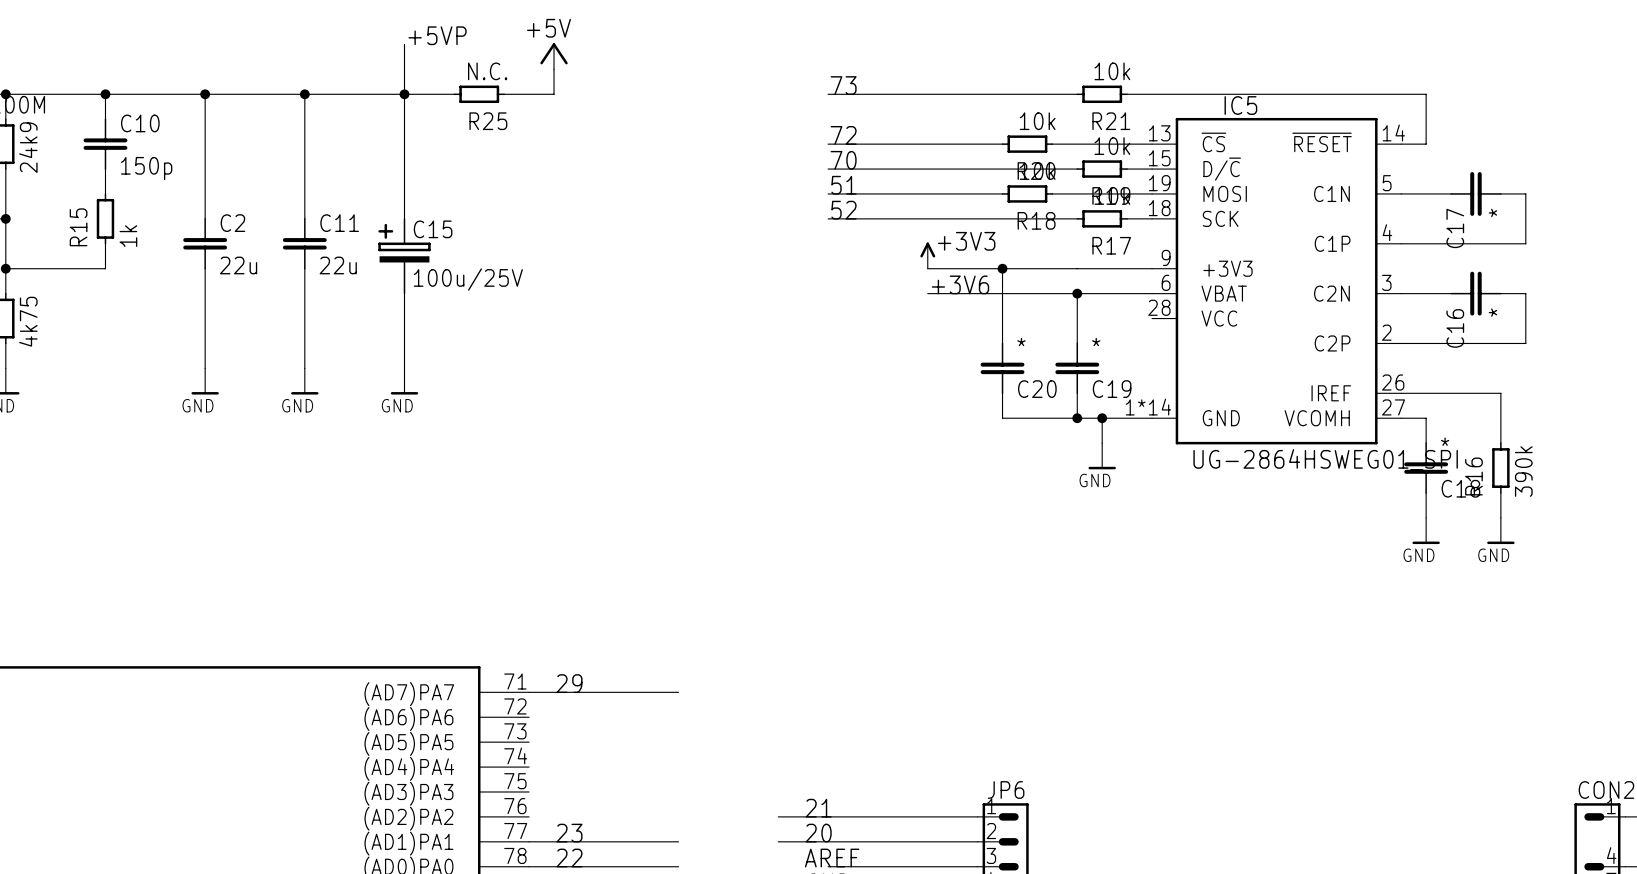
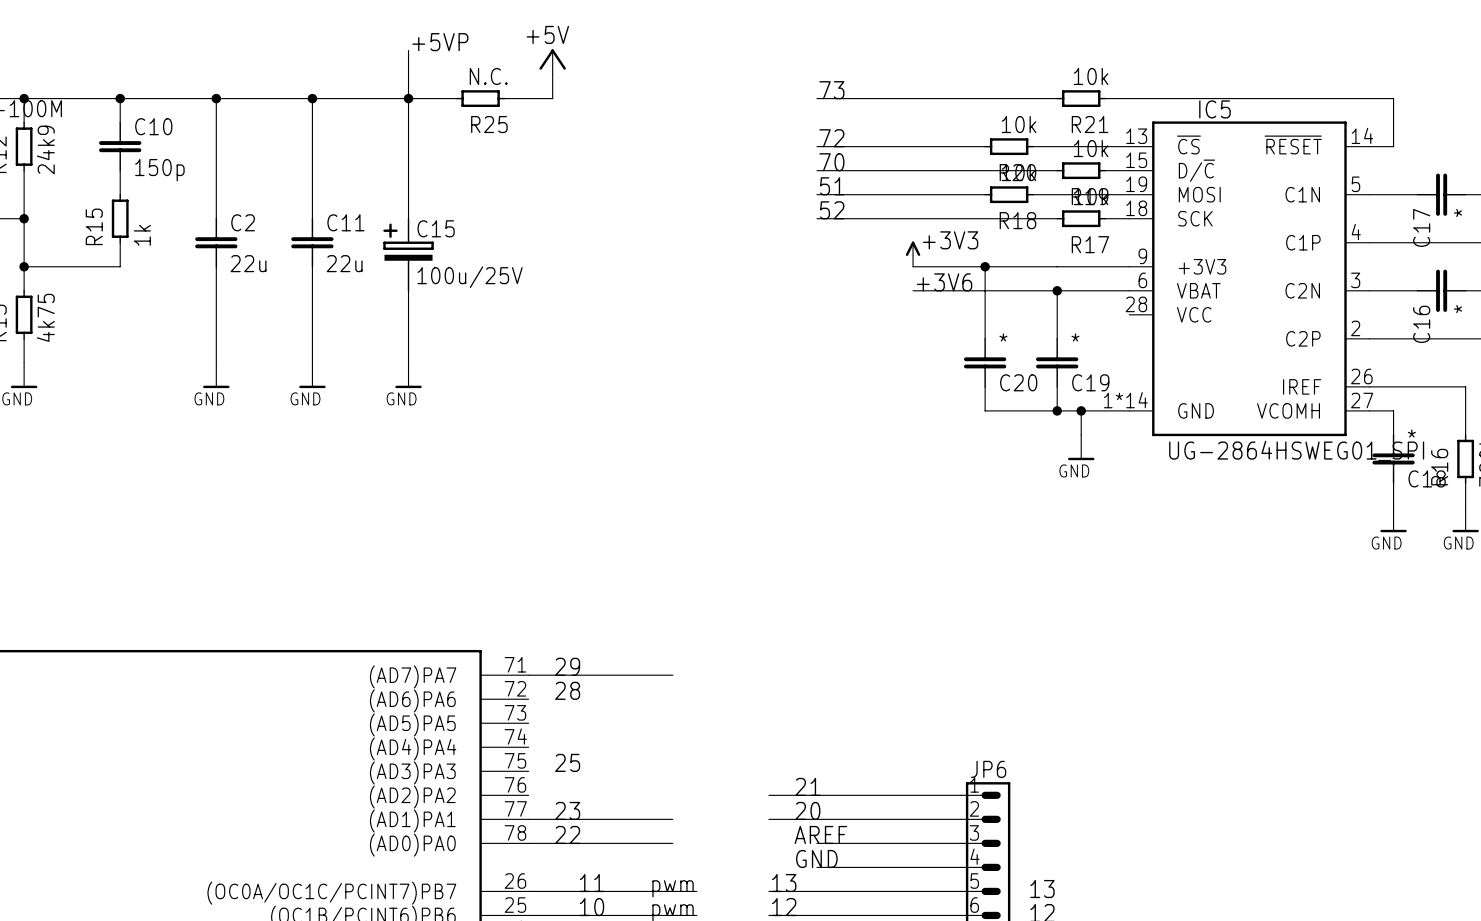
text: none -> 28 (567, 690)
text: none -> 25 (567, 762)

